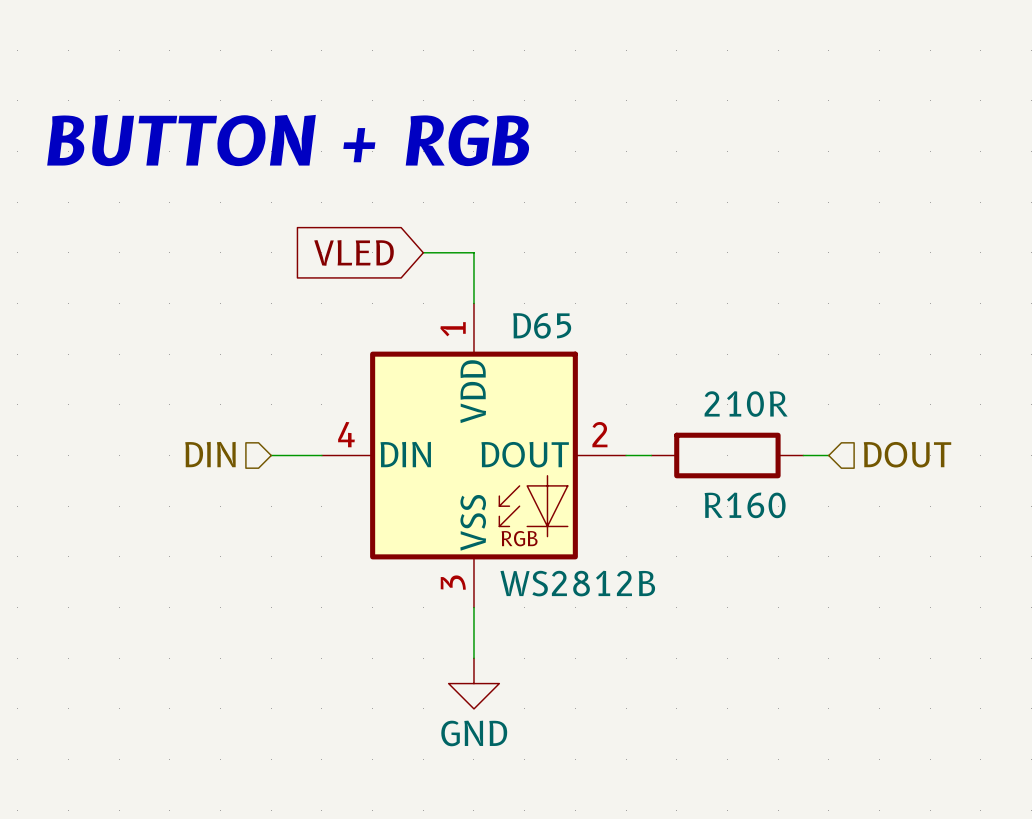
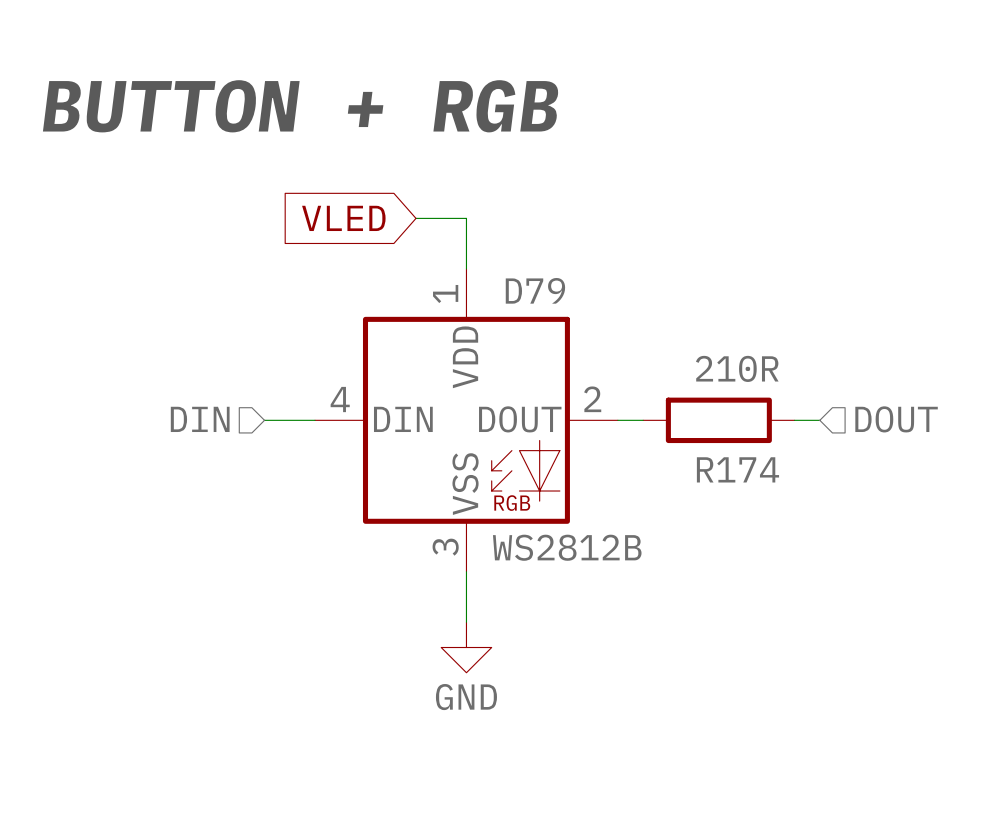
D65 name: D65 (542, 325) -> D79 (535, 290)
R160 name: R160 (745, 505) -> R174 (737, 469)

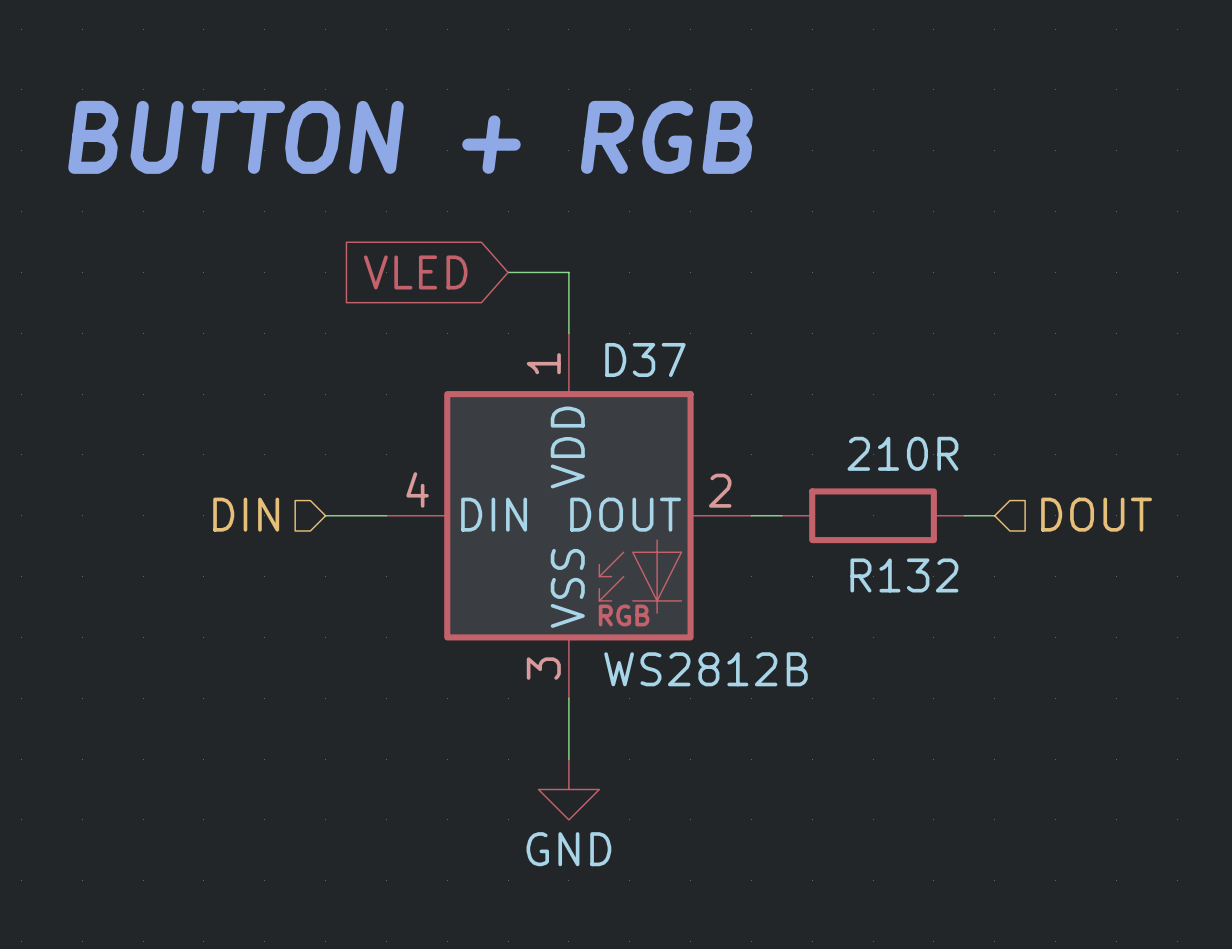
D79 name: D79 (535, 290) -> D37 (645, 359)
R174 name: R174 (737, 469) -> R132 (904, 575)

